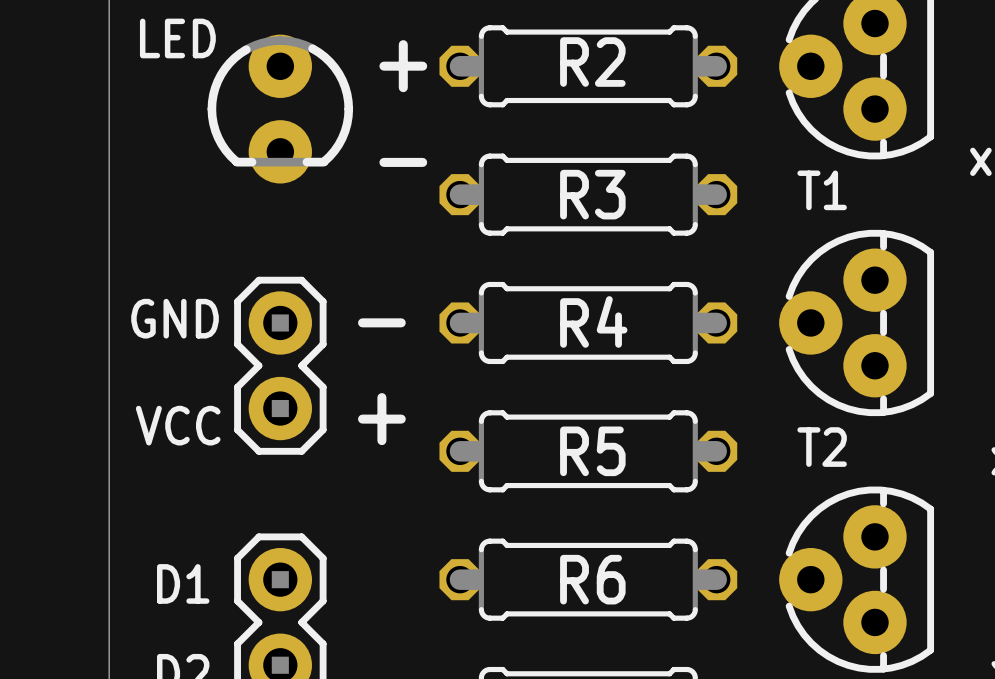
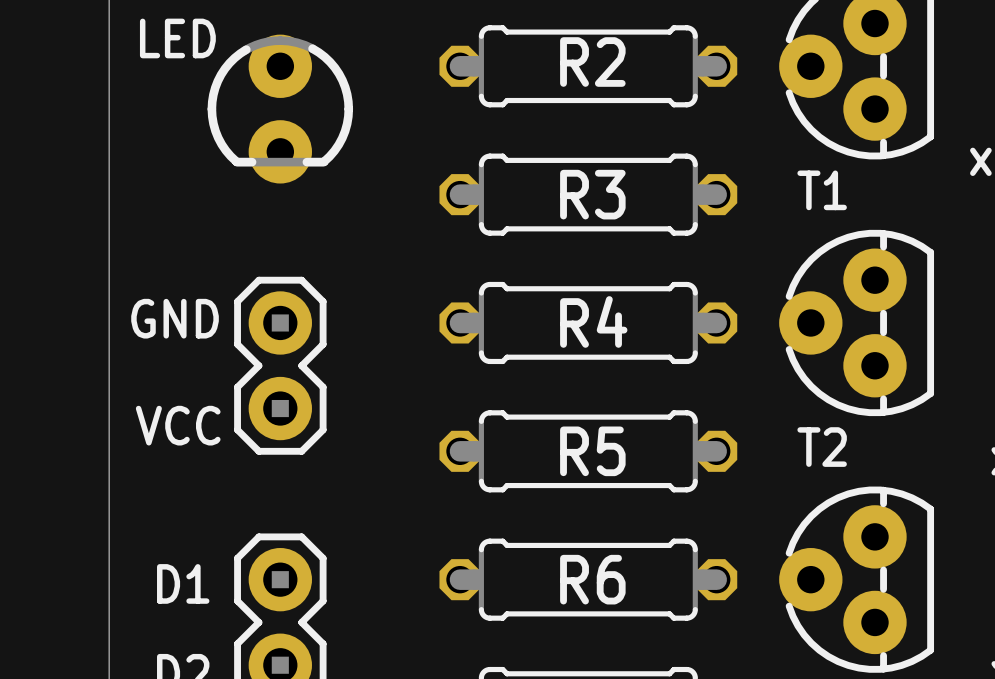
text: + (403, 66) -> none
text: - (403, 162) -> none
text: - (381, 322) -> none
text: + (381, 419) -> none

